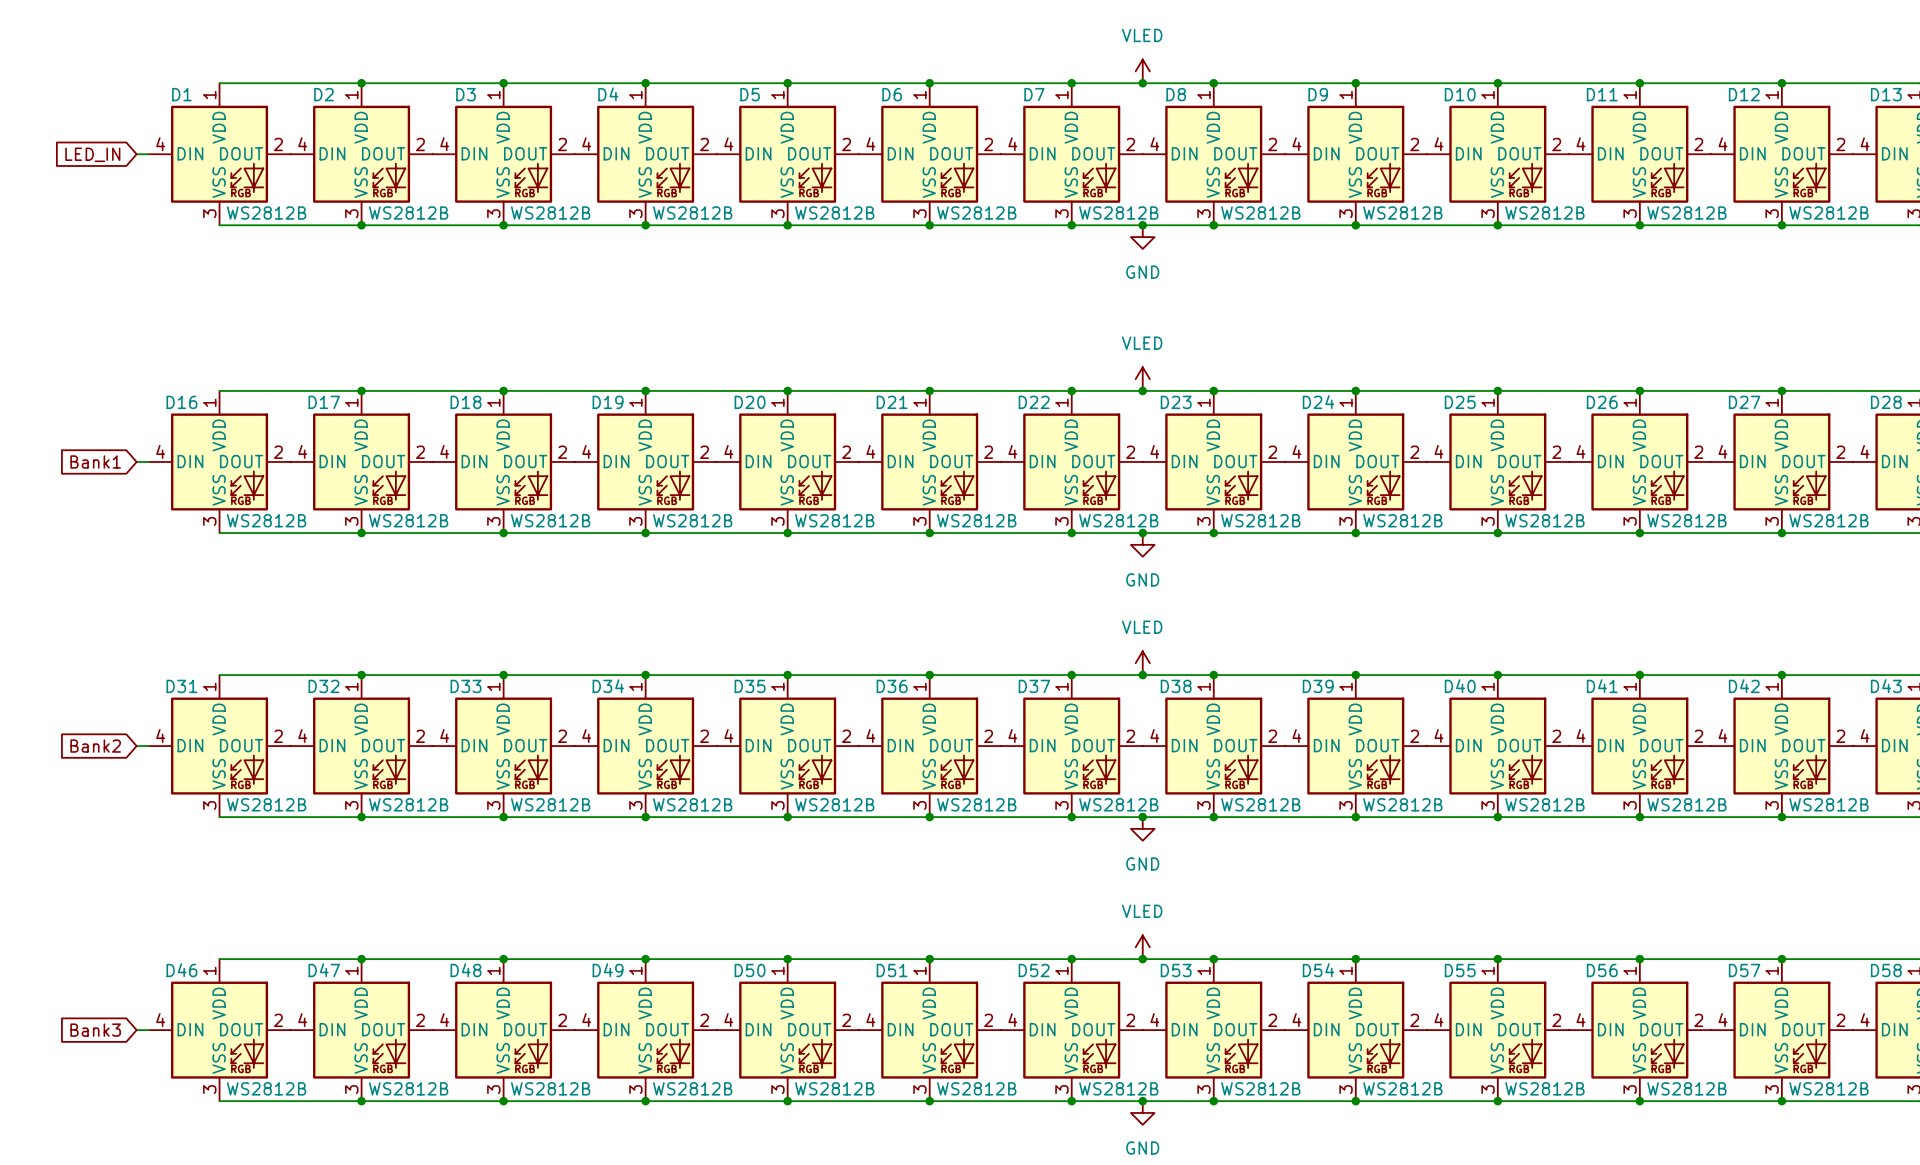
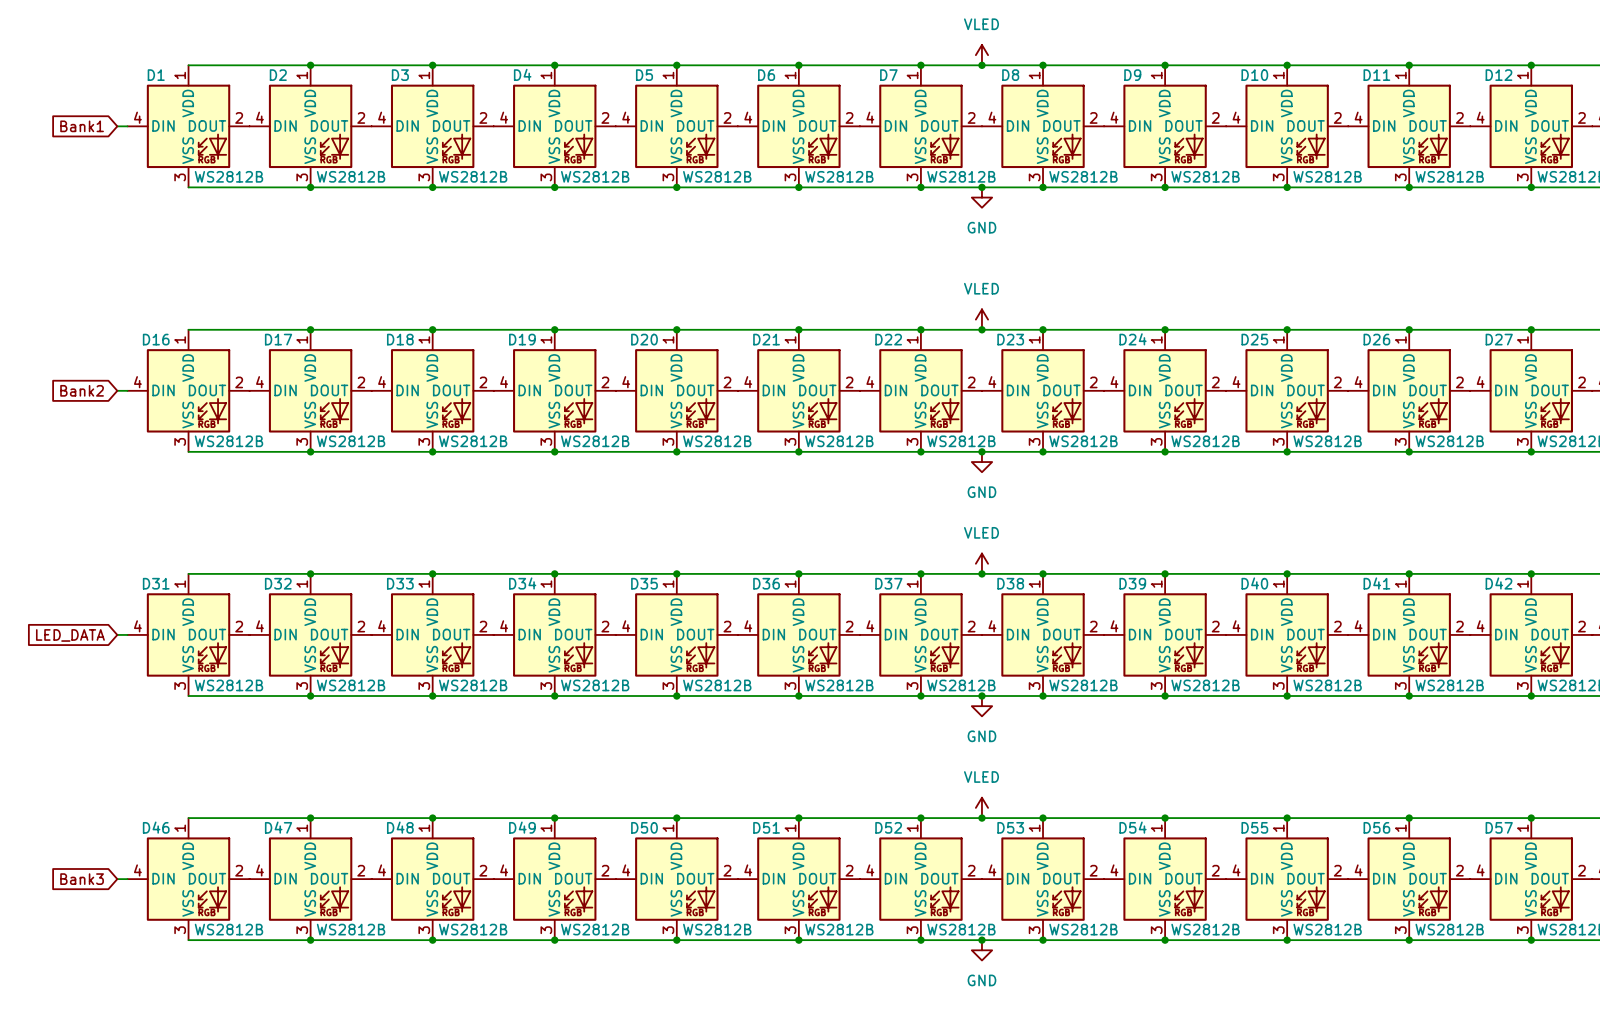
global label: LED_IN (92, 154) -> Bank1 (82, 126)
global label: Bank1 (95, 461) -> Bank2 (82, 390)
global label: Bank2 (95, 746) -> LED_DATA (70, 635)

